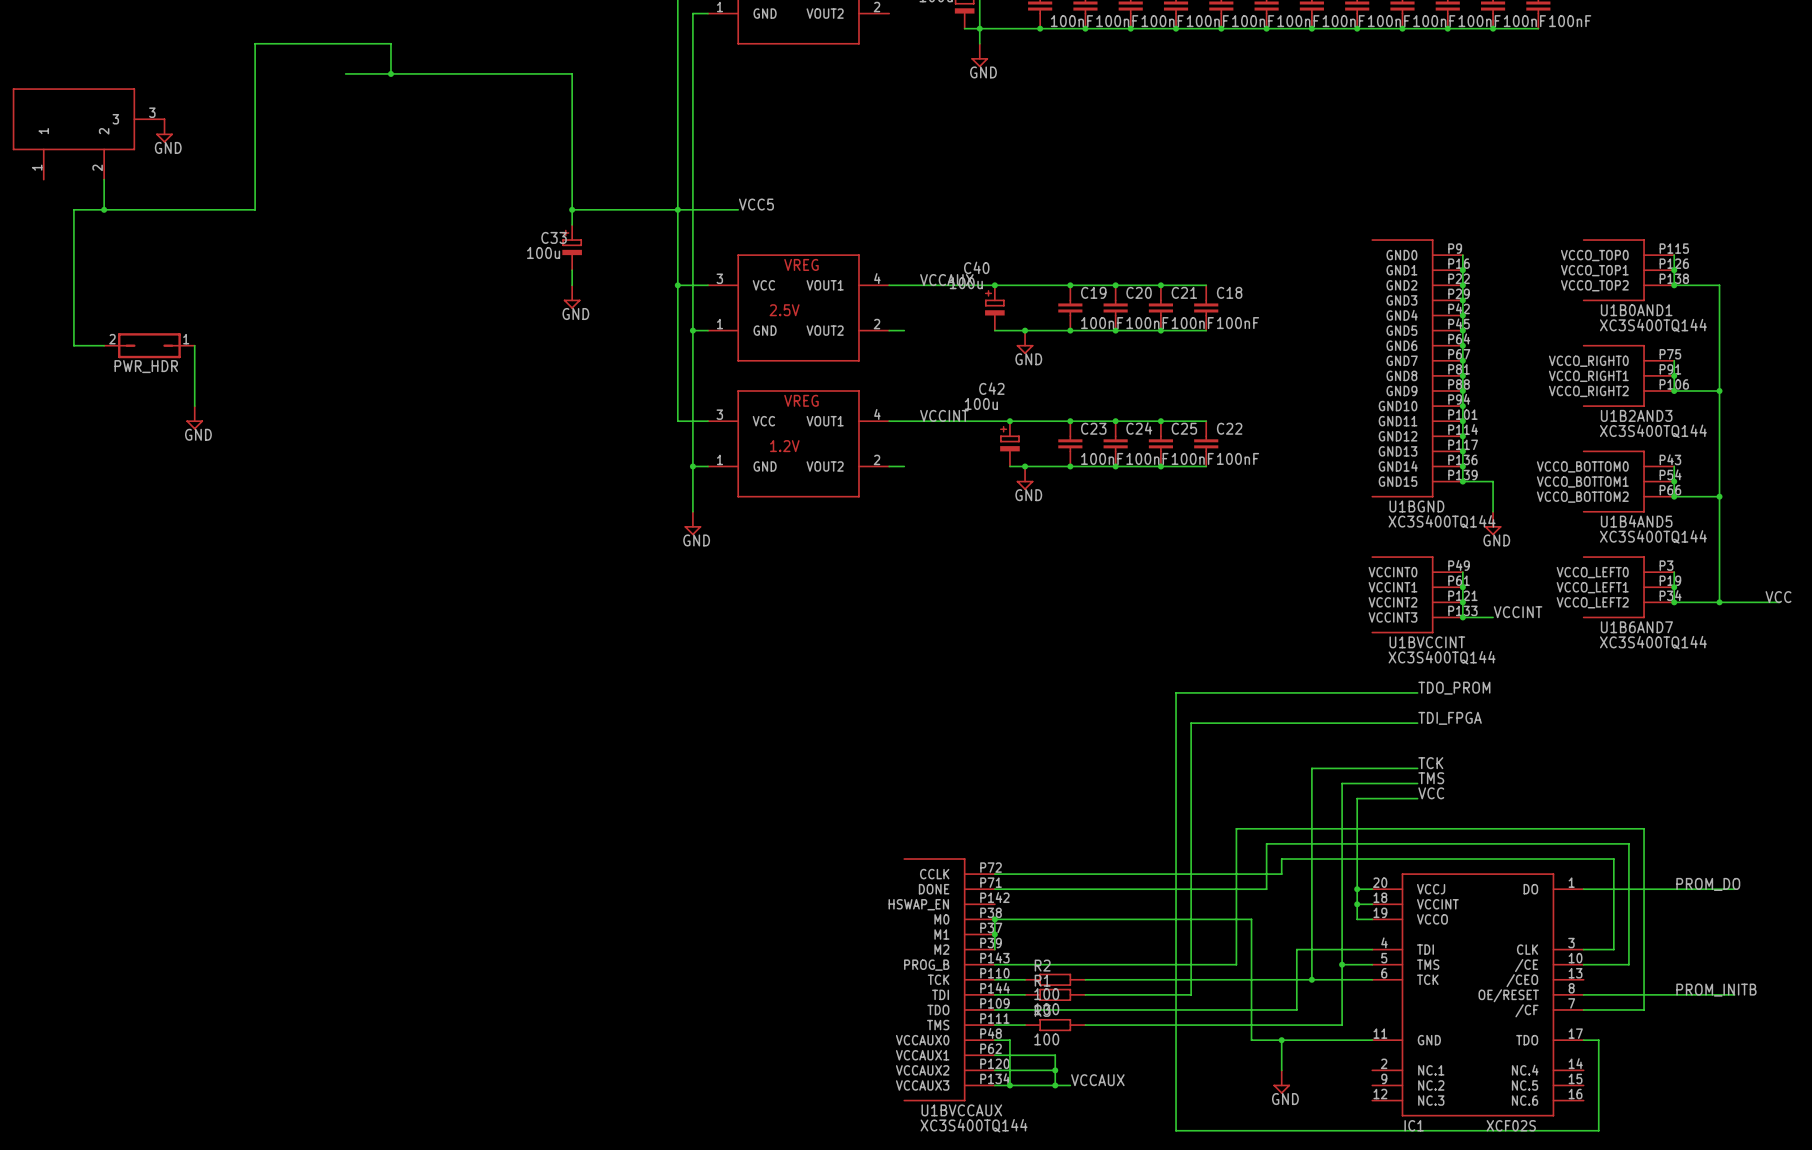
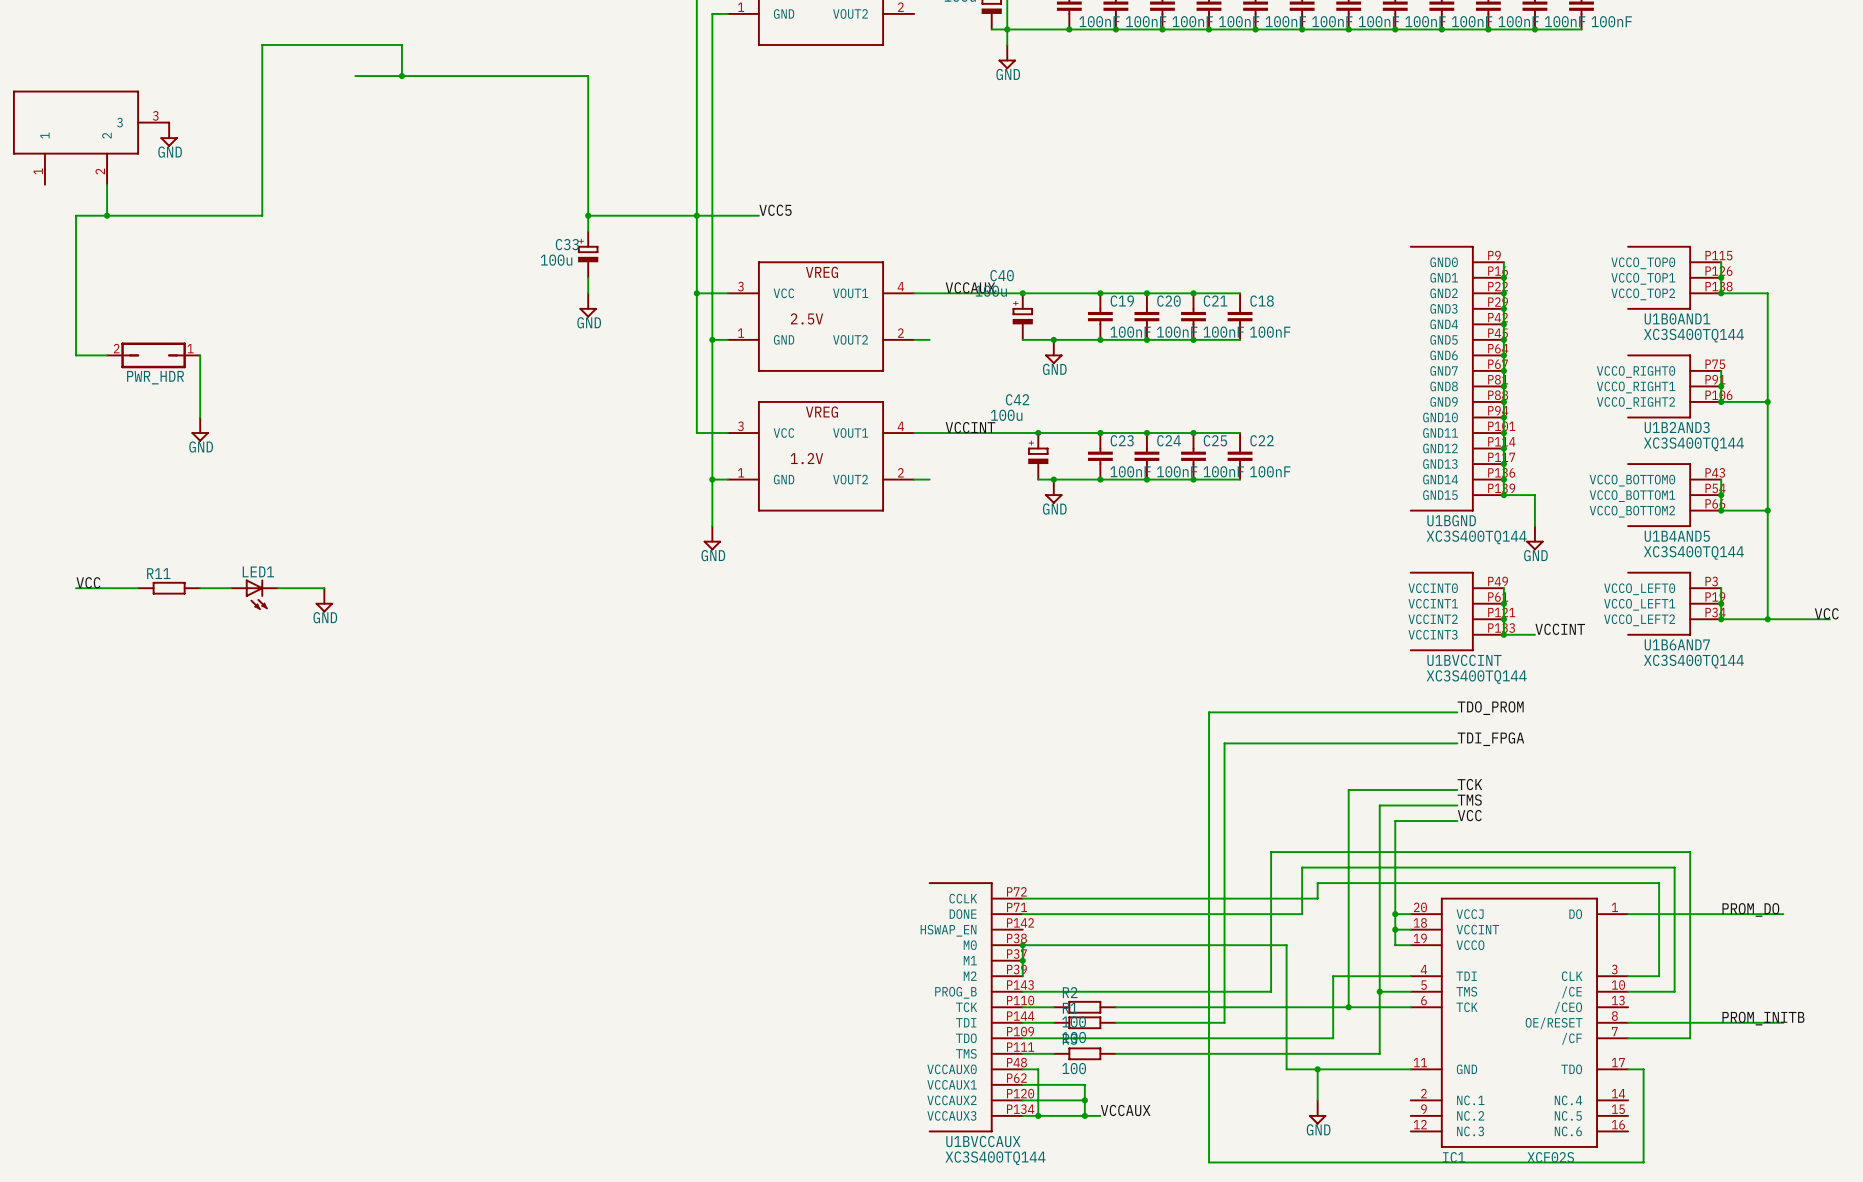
label: none -> VCC (88, 582)
wire: none -> (76, 588) (138, 588)
R11: none -> (169, 588)
wire: none -> (200, 588) (231, 588)
wire: none -> (277, 588) (324, 588)
LED1: none -> (254, 594)
power symbol: none -> GND (324, 600)

